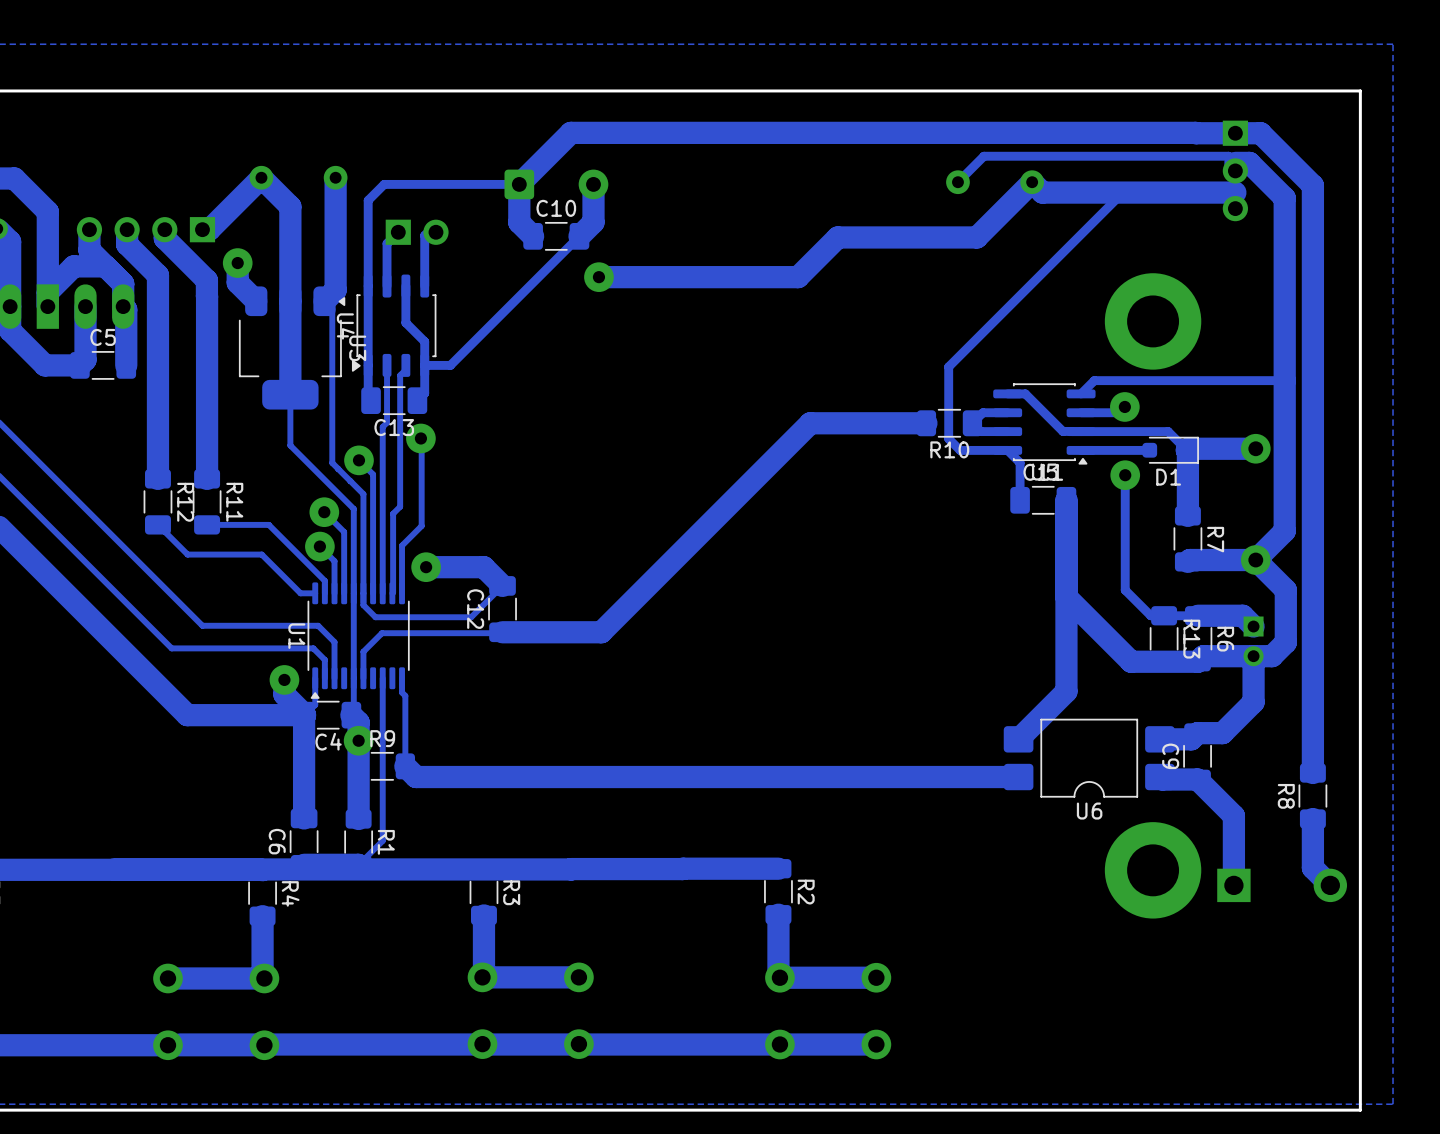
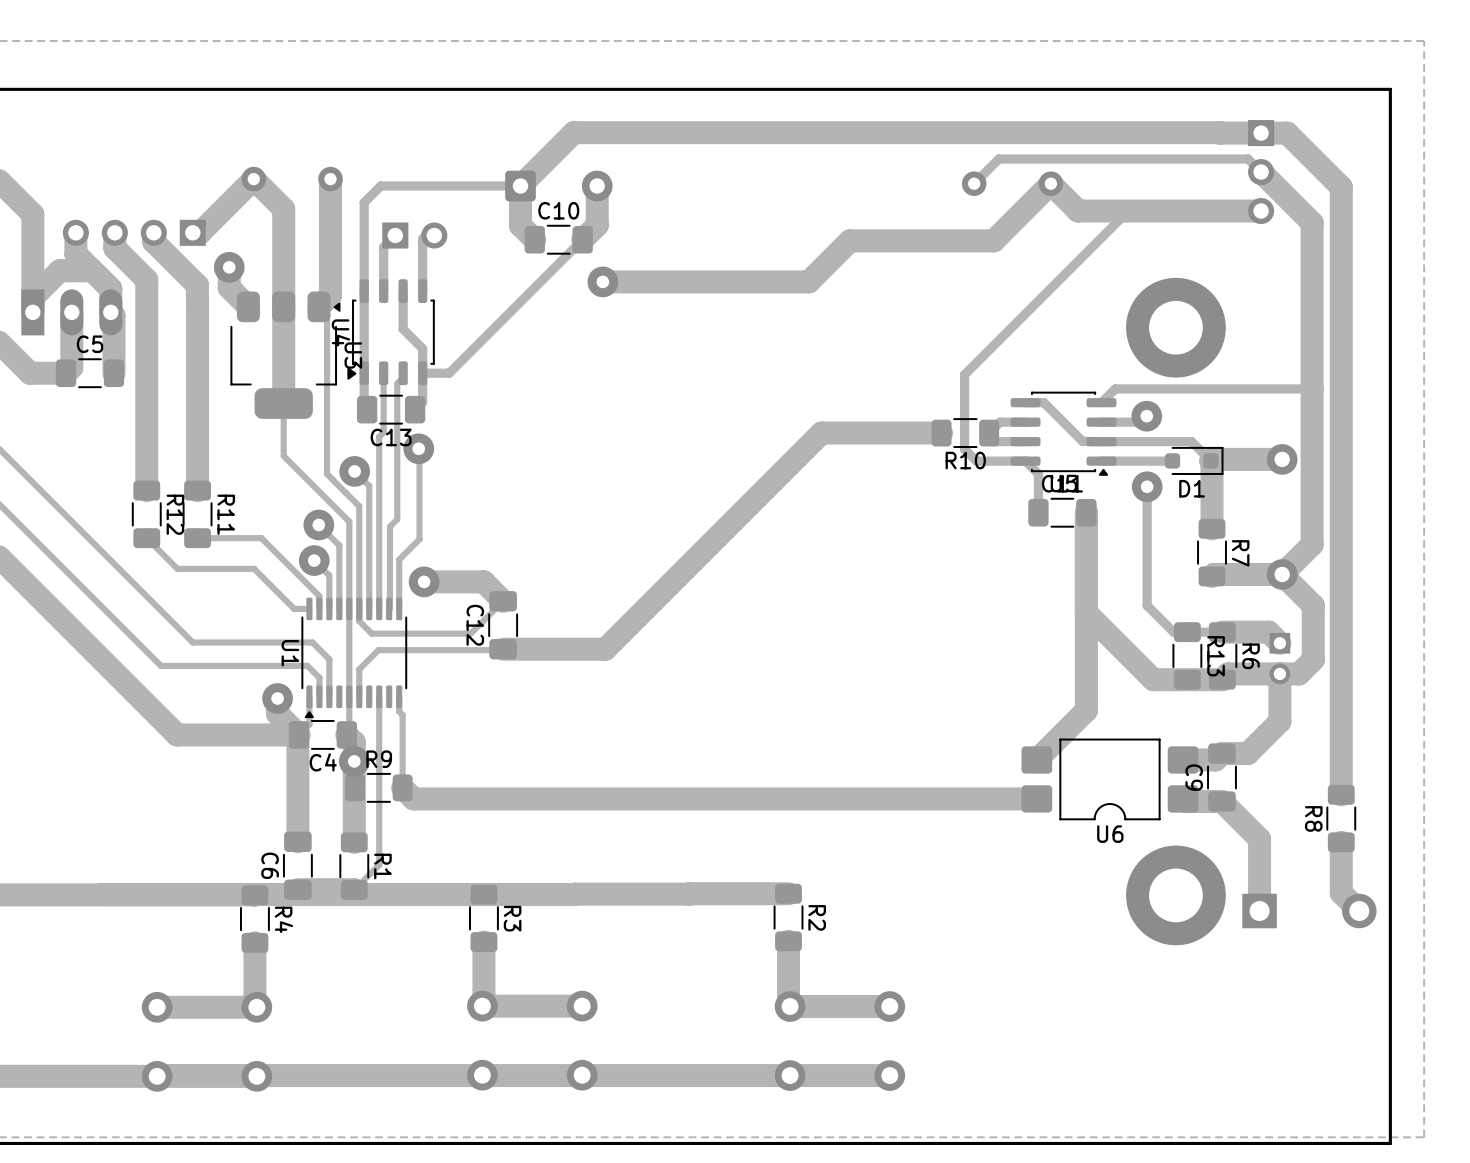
track: (981, 158) (983, 156) (1228, 156) (1235, 162) (1249, 162) (1284, 198) (1284, 220) -> (998, 159) (1248, 159) (1261, 172)
track: none -> (1261, 171) (1312, 222)
track: (1042, 192) (1235, 192) (1123, 192) (1106, 208) -> (1061, 194) (1078, 211) (1261, 211) (1128, 211)

